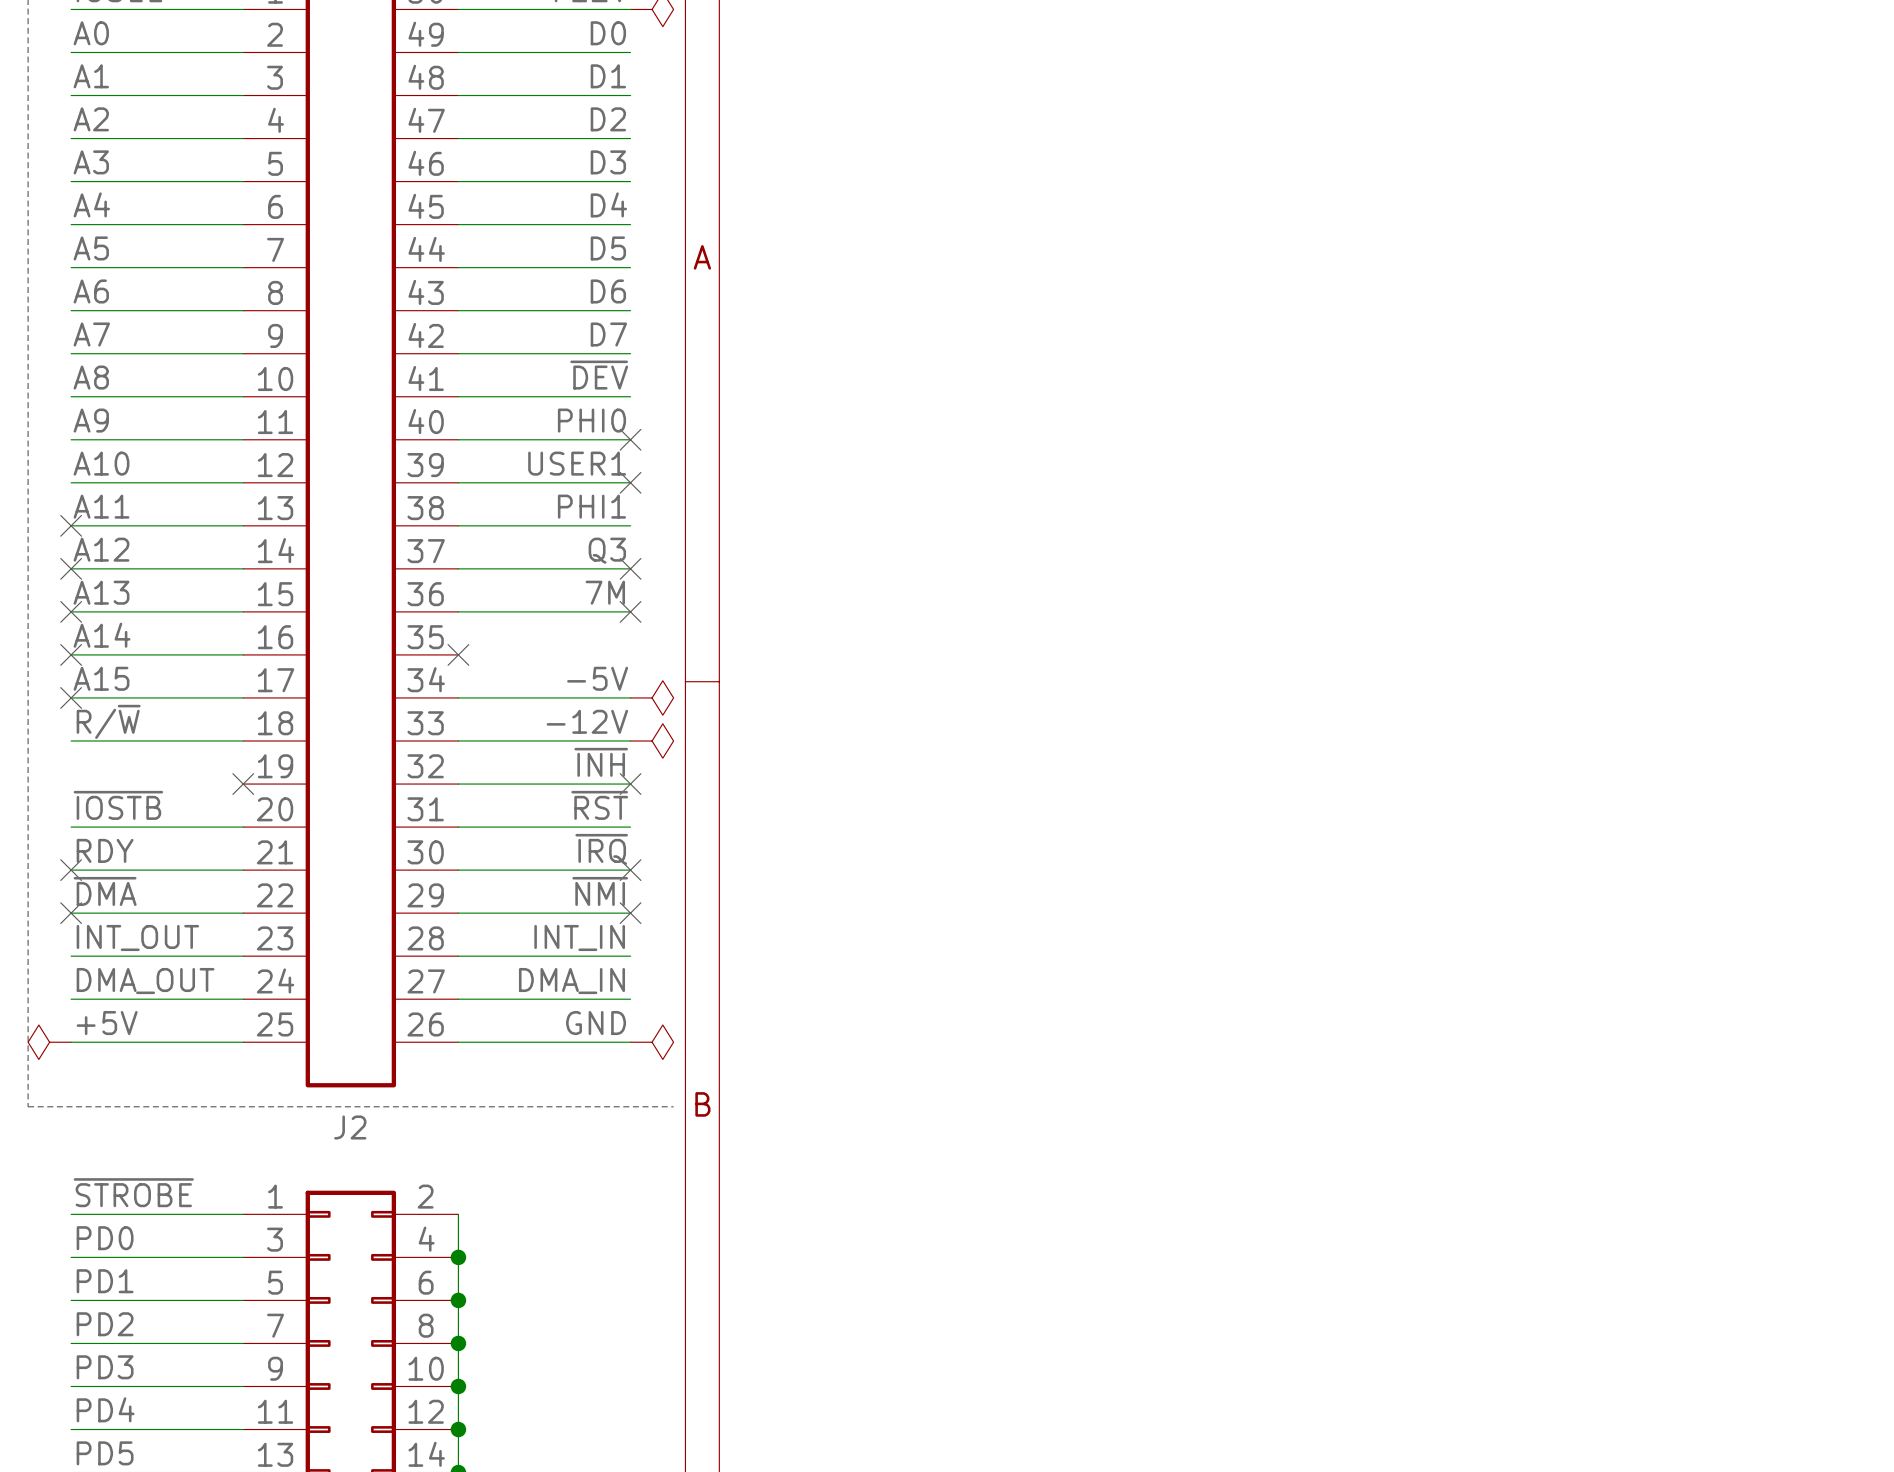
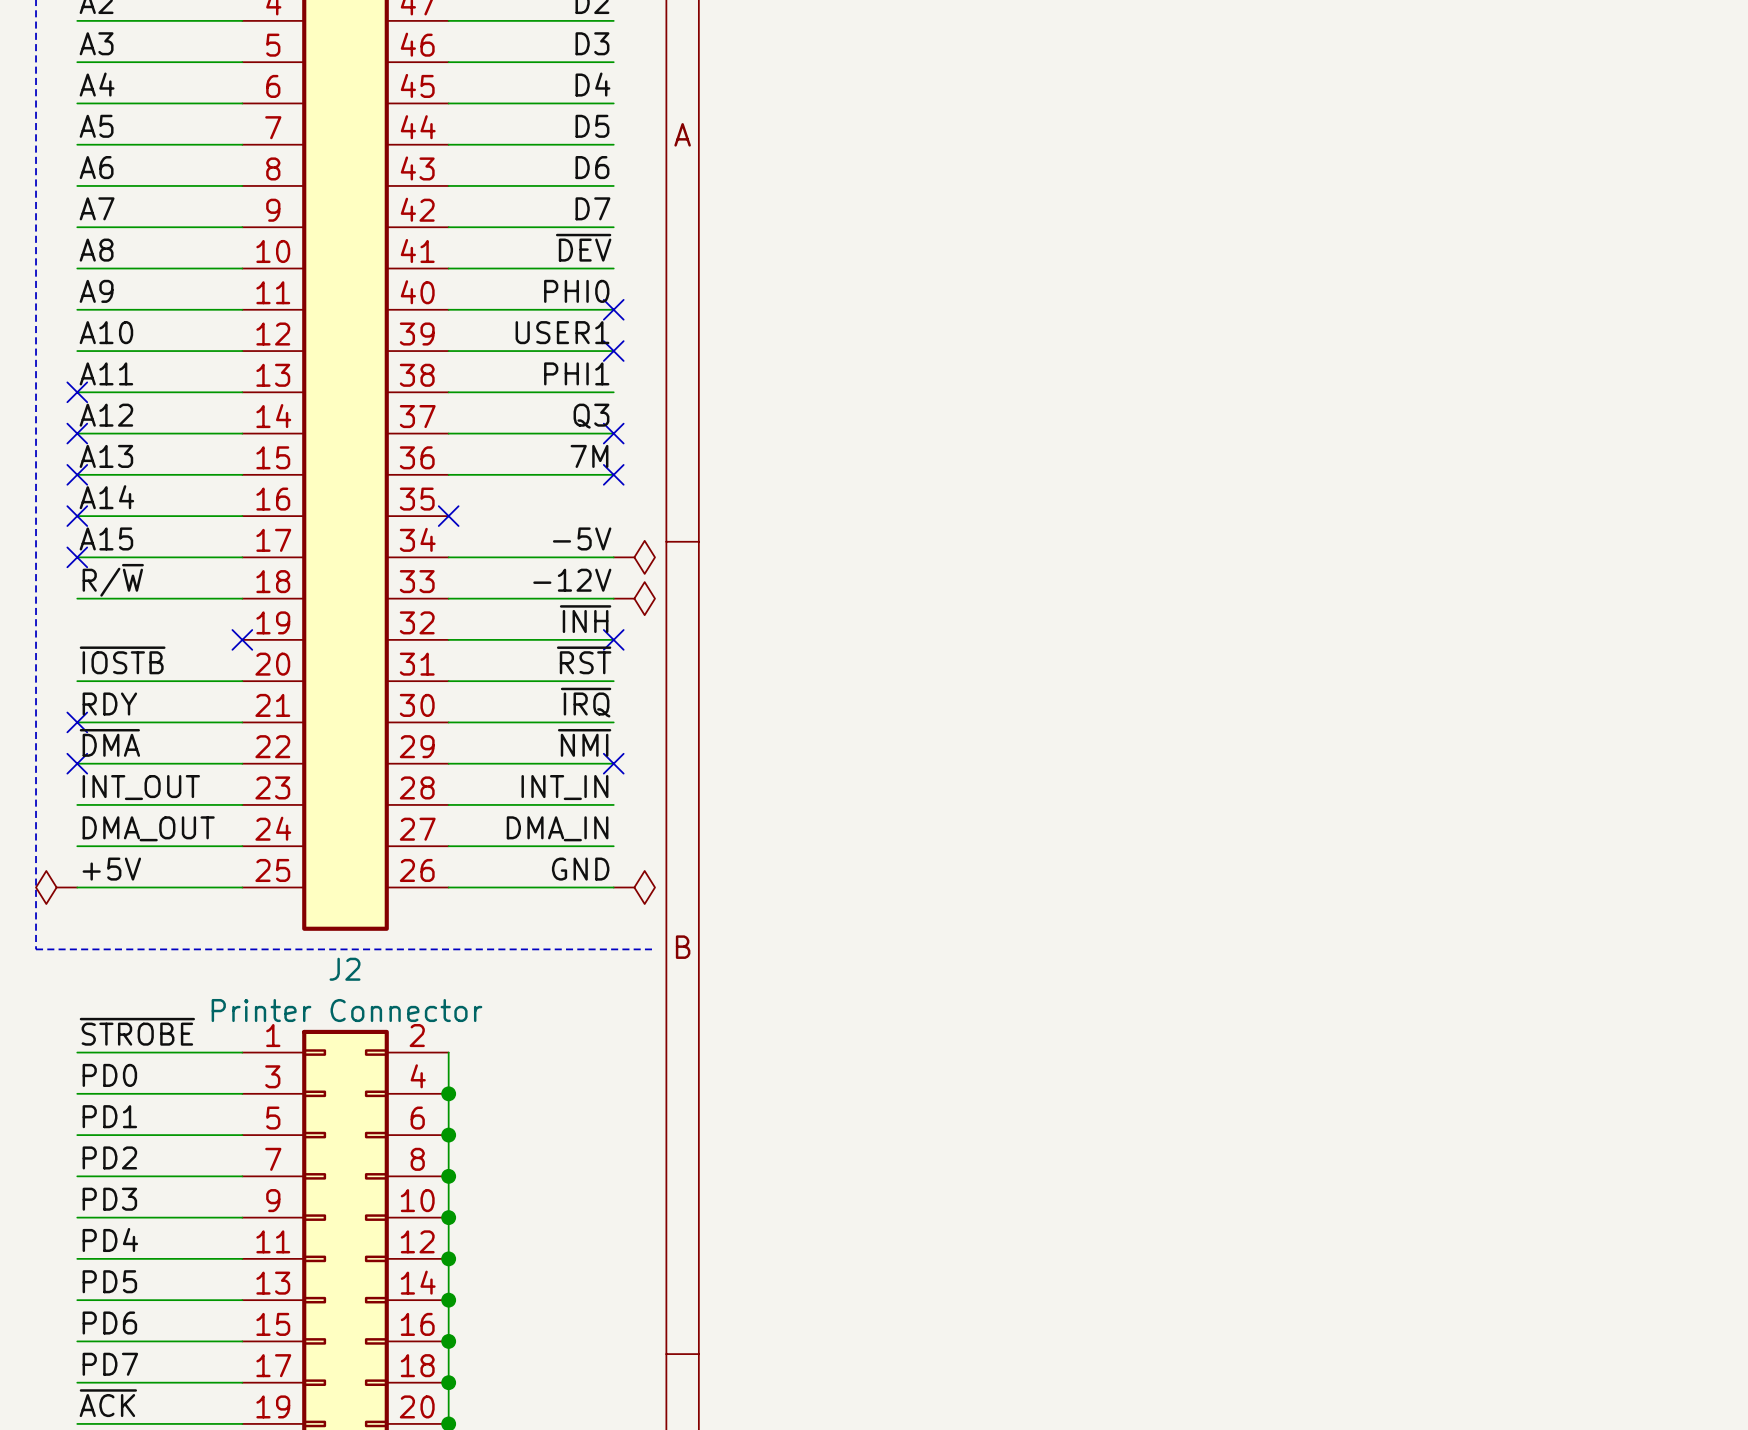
no-connect mark: (630, 870) -> none
J2 value: none -> Printer Connector (346, 1010)

